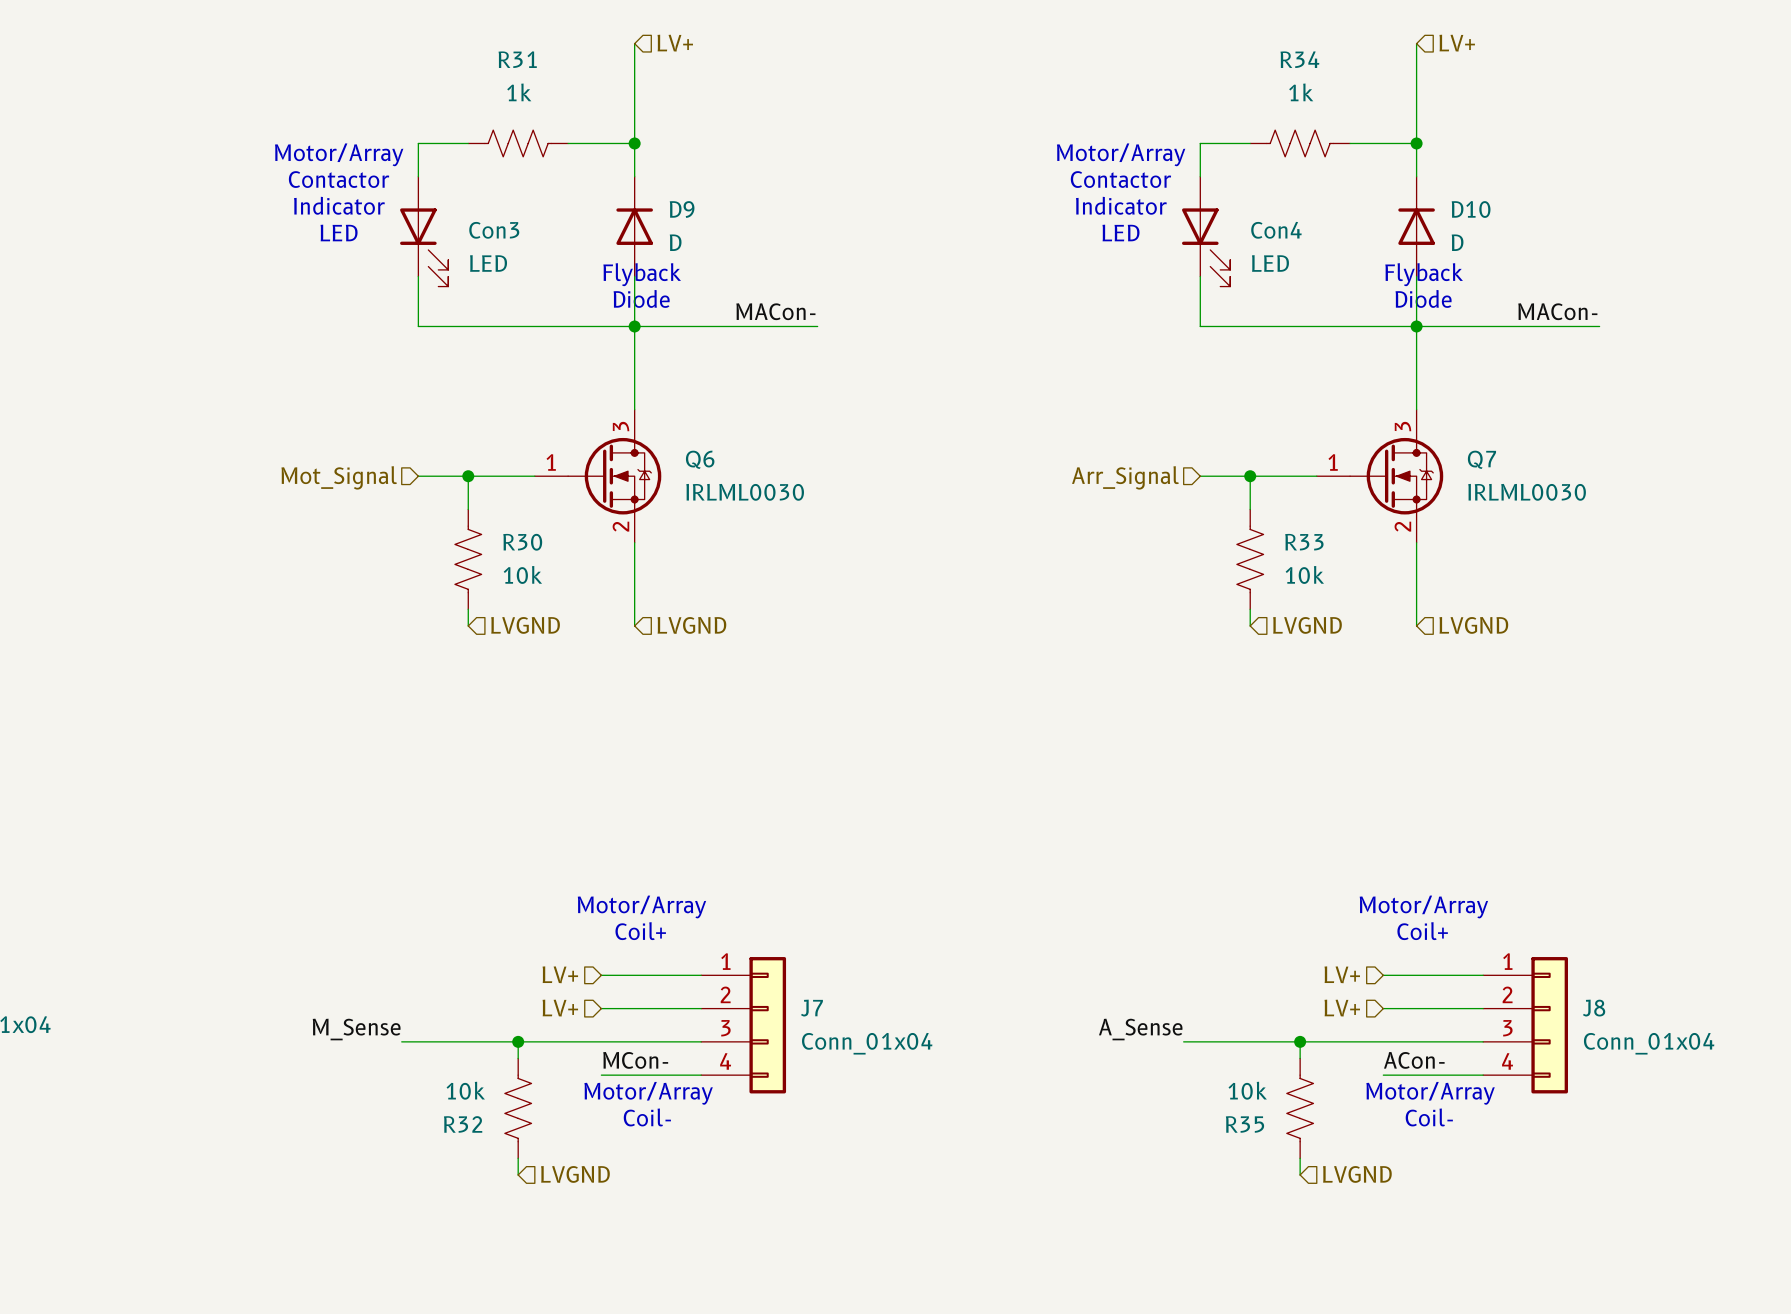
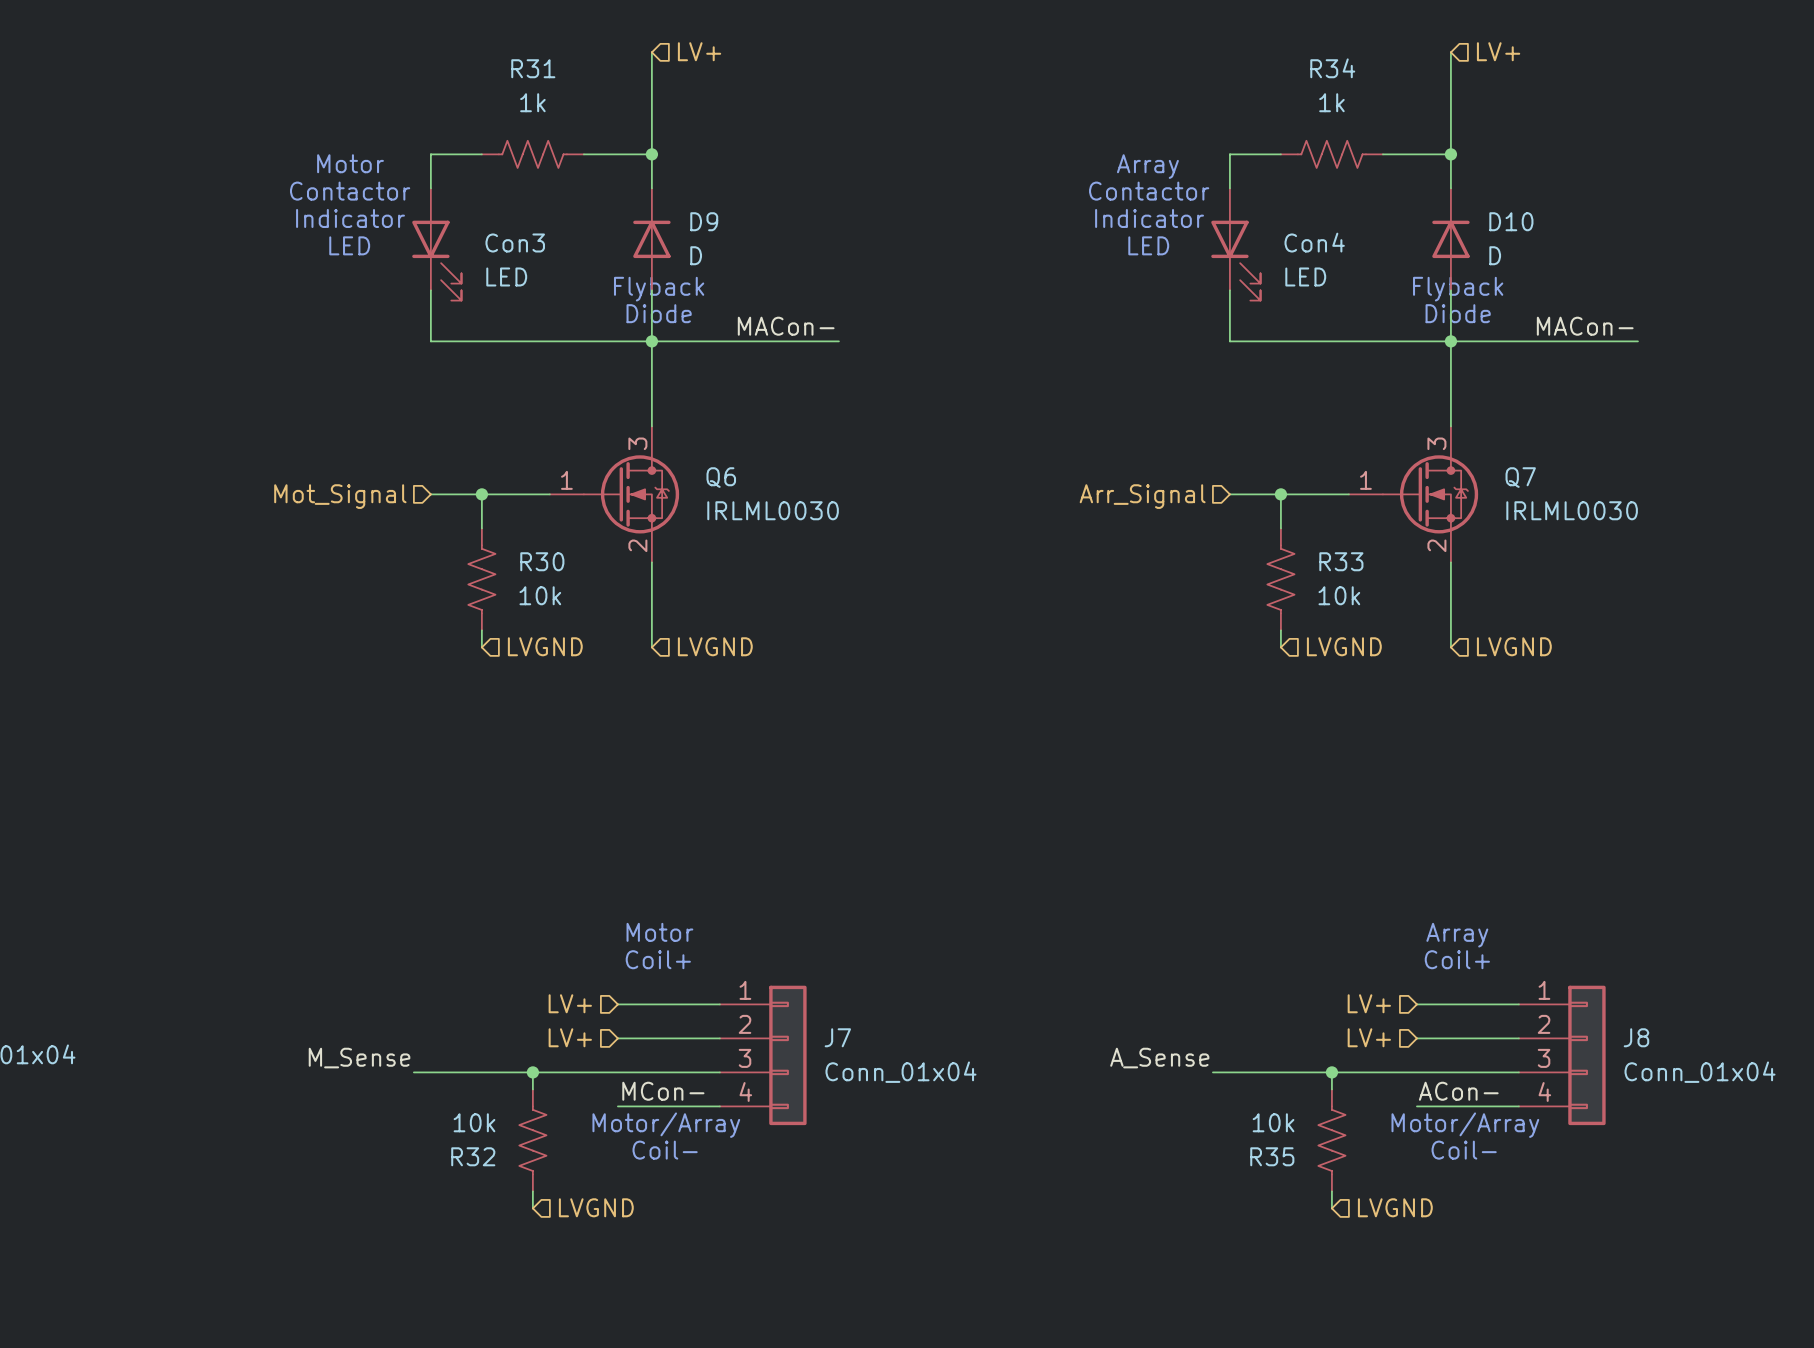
text: Motor/Array (339, 154) -> Motor (350, 163)
text: Motor/Array (1121, 154) -> Array (1147, 166)
text: Motor/Array (641, 906) -> Motor (659, 932)
text: Motor/Array (1423, 906) -> Array (1457, 935)

